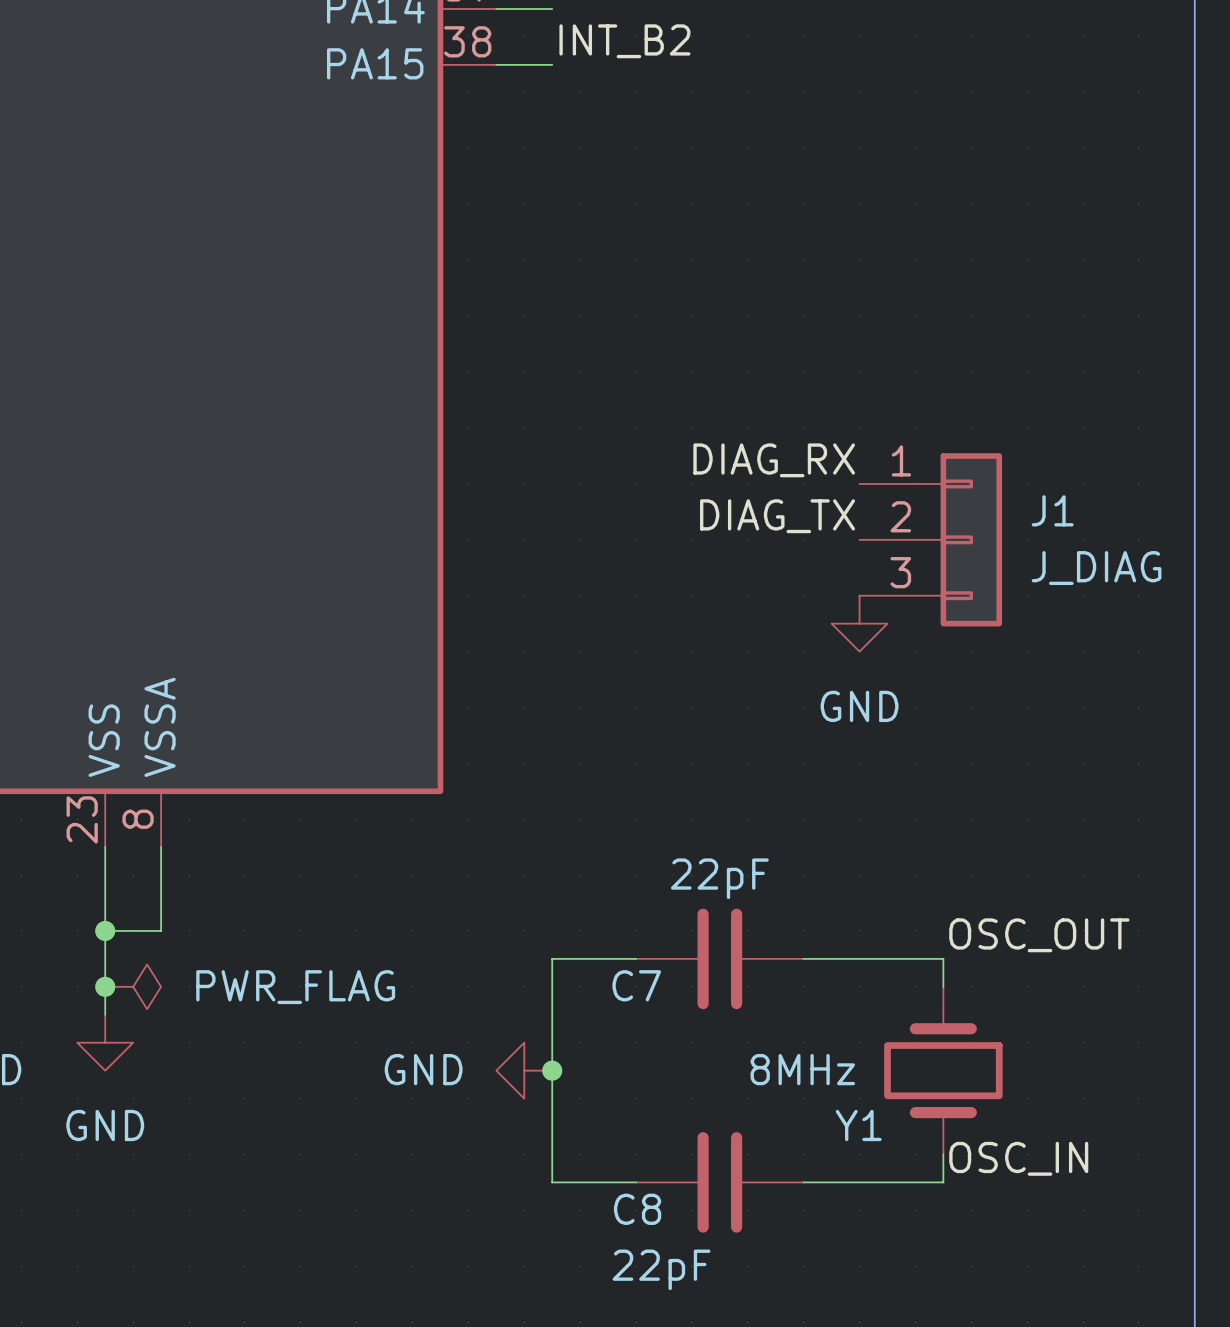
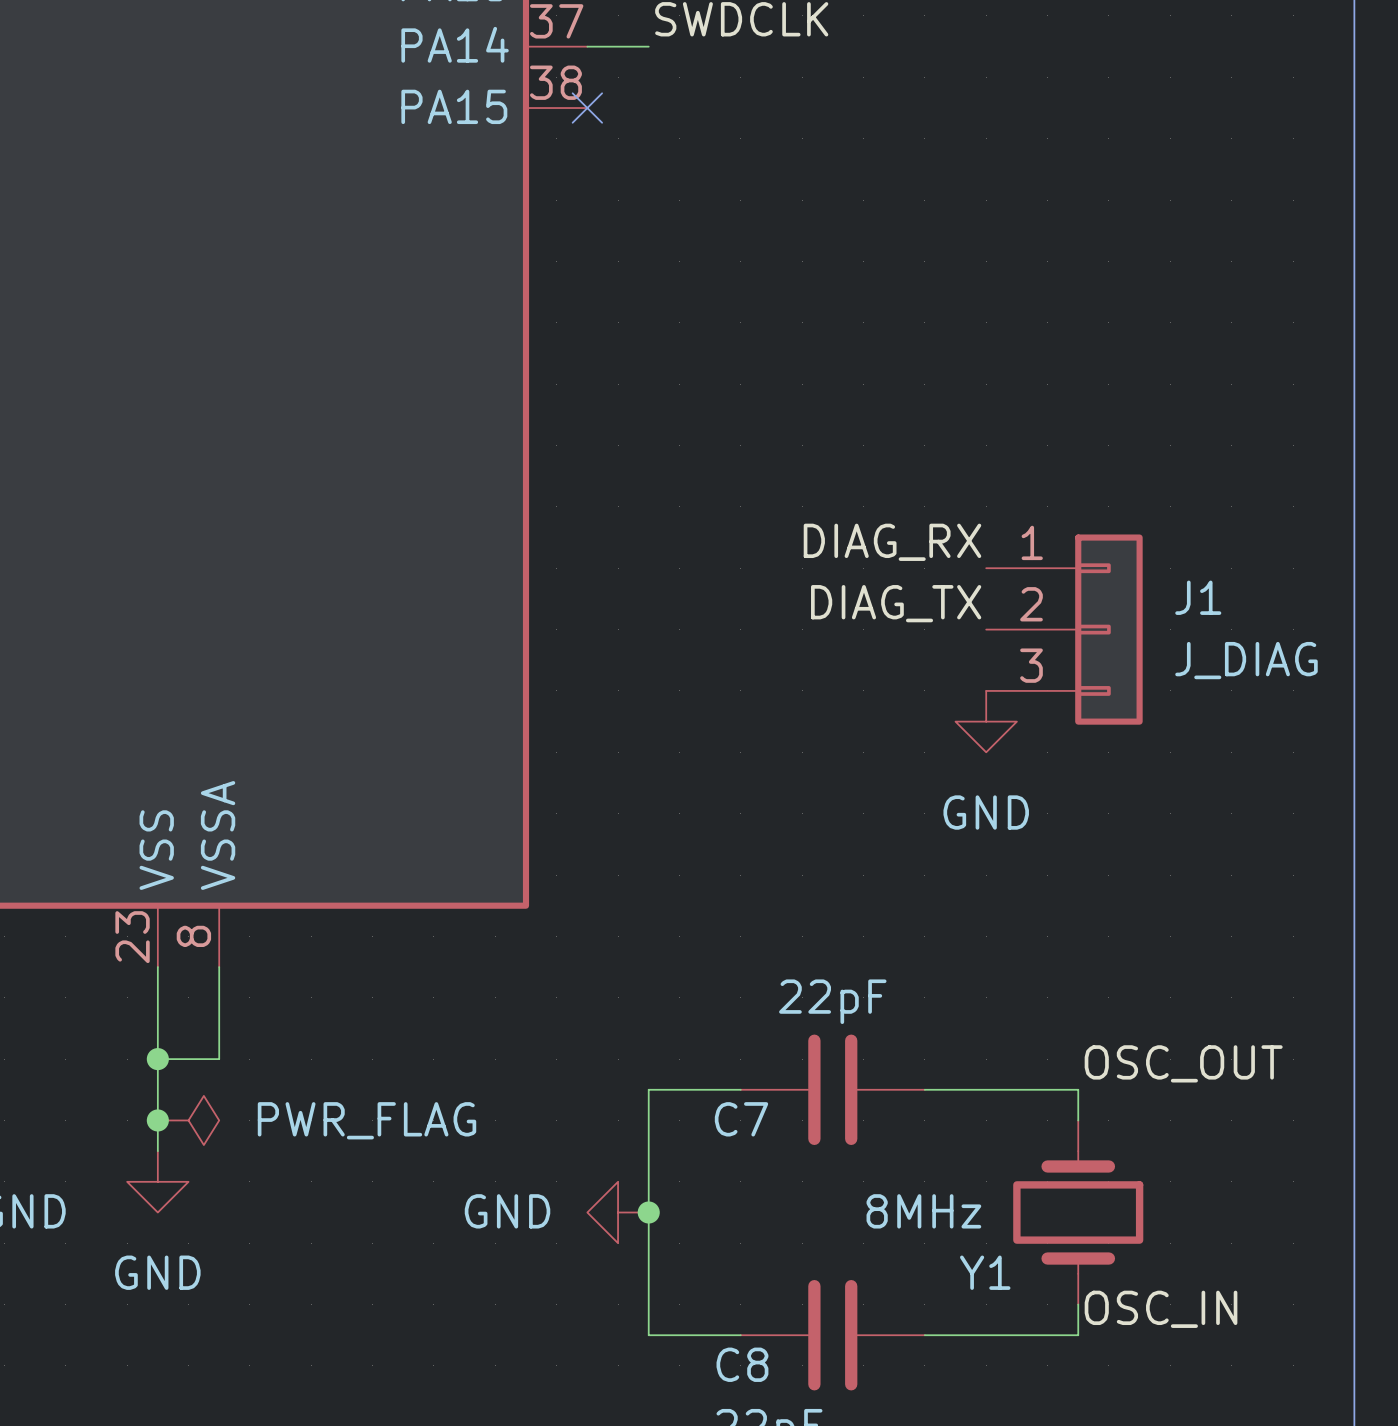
label: INT_B2 (624, 41) -> none
wire: (496, 64) (552, 64) -> none
no-connect mark: none -> (587, 108)

